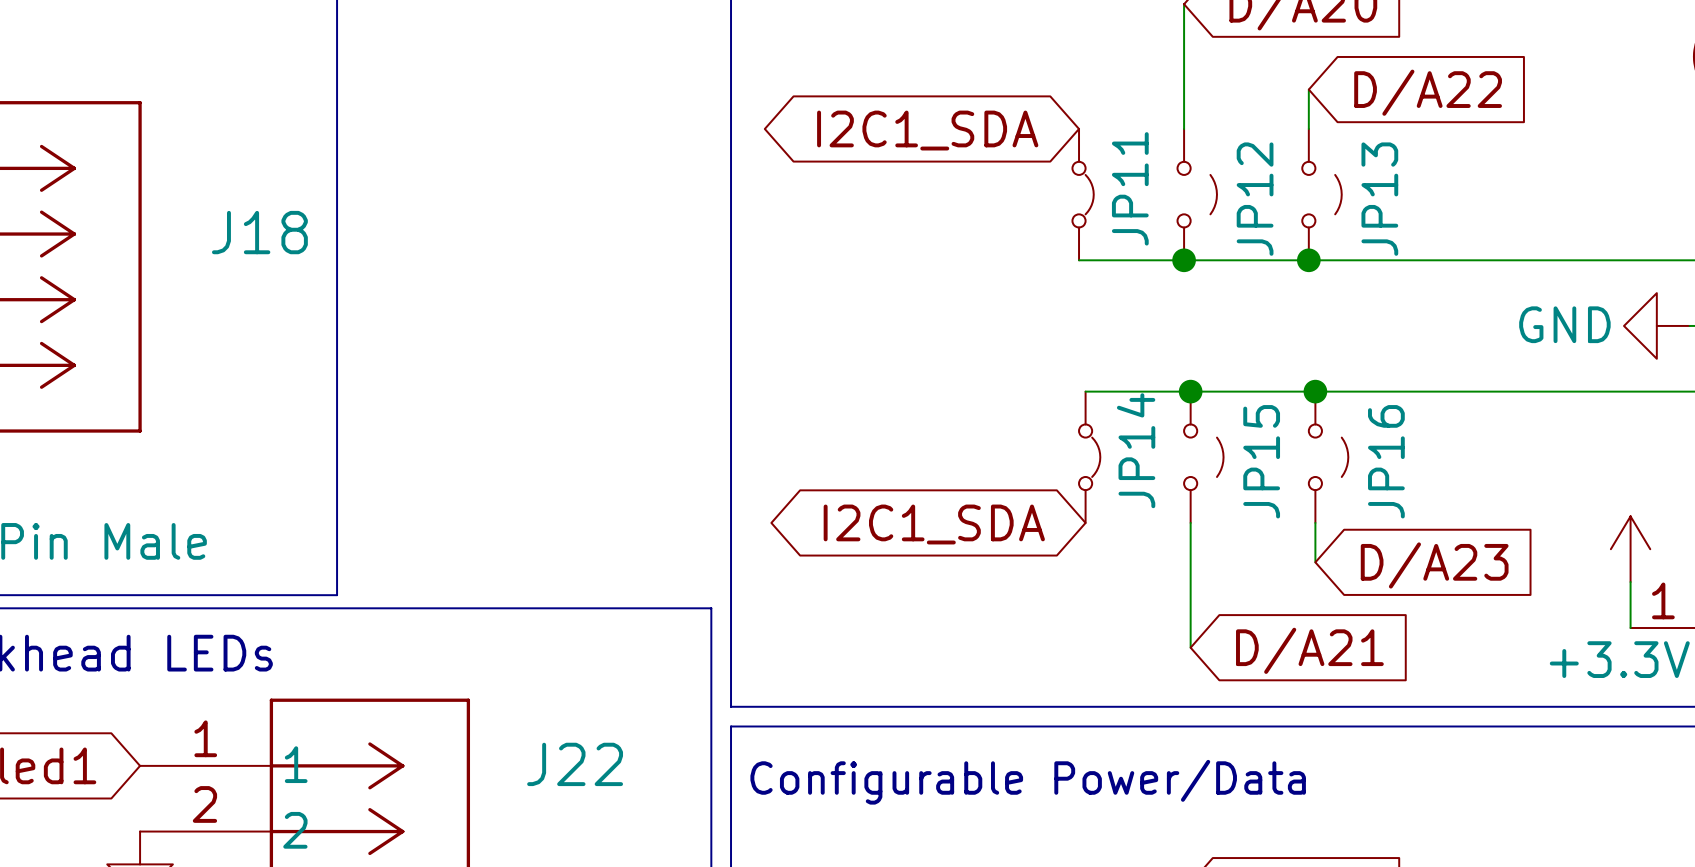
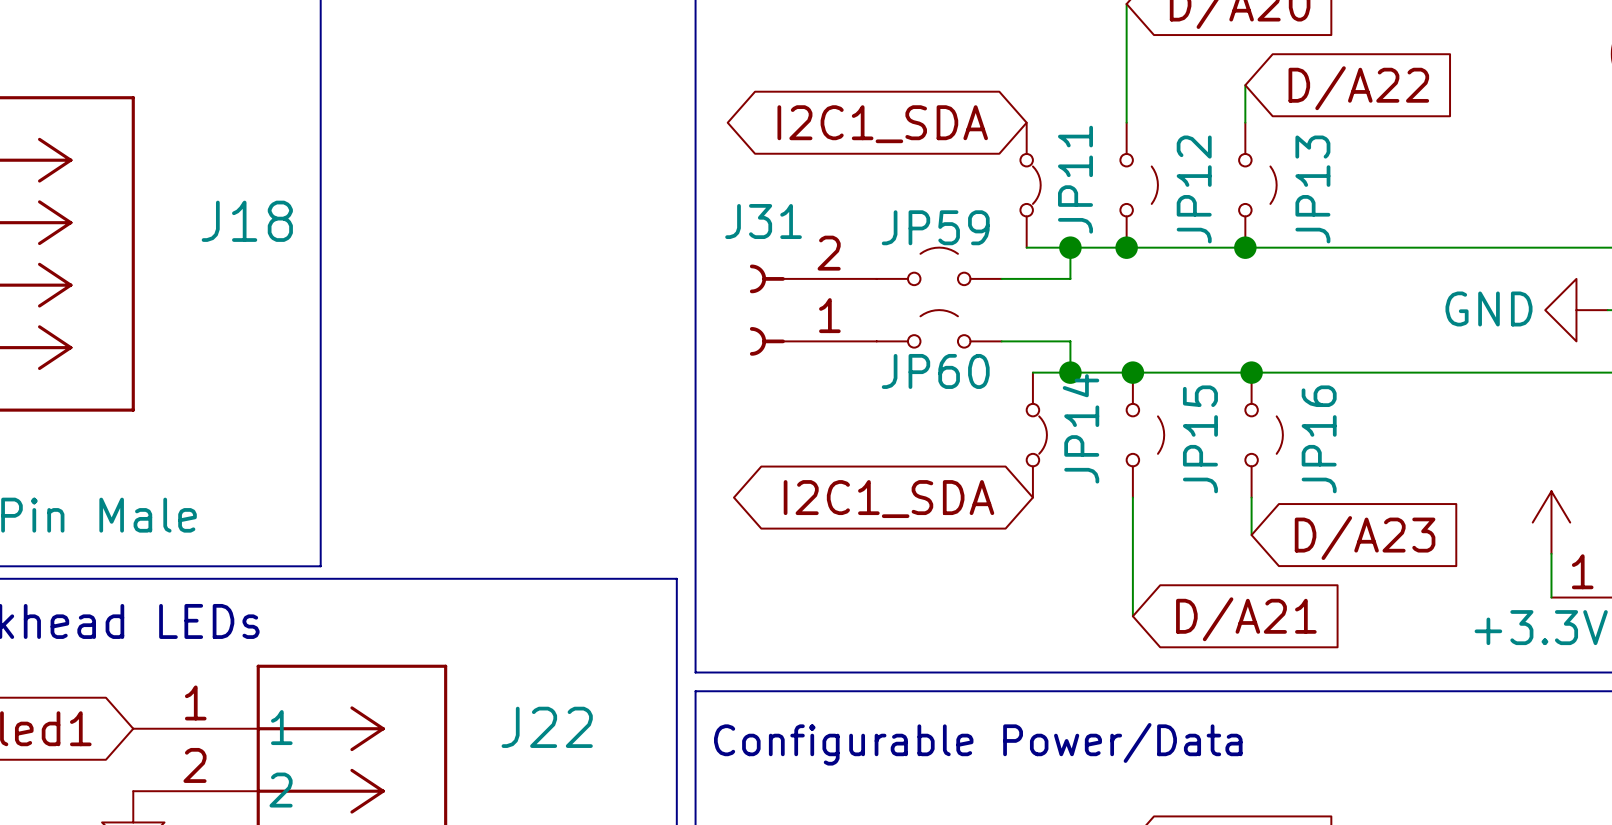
wire: none -> (1070, 247) (1070, 278) (1001, 278)
junction: none -> (1070, 247)
JP59: none -> (939, 266)
J31: none -> (813, 310)
JP60: none -> (939, 328)
wire: none -> (1001, 341) (1070, 341) (1070, 372)
junction: none -> (1070, 372)

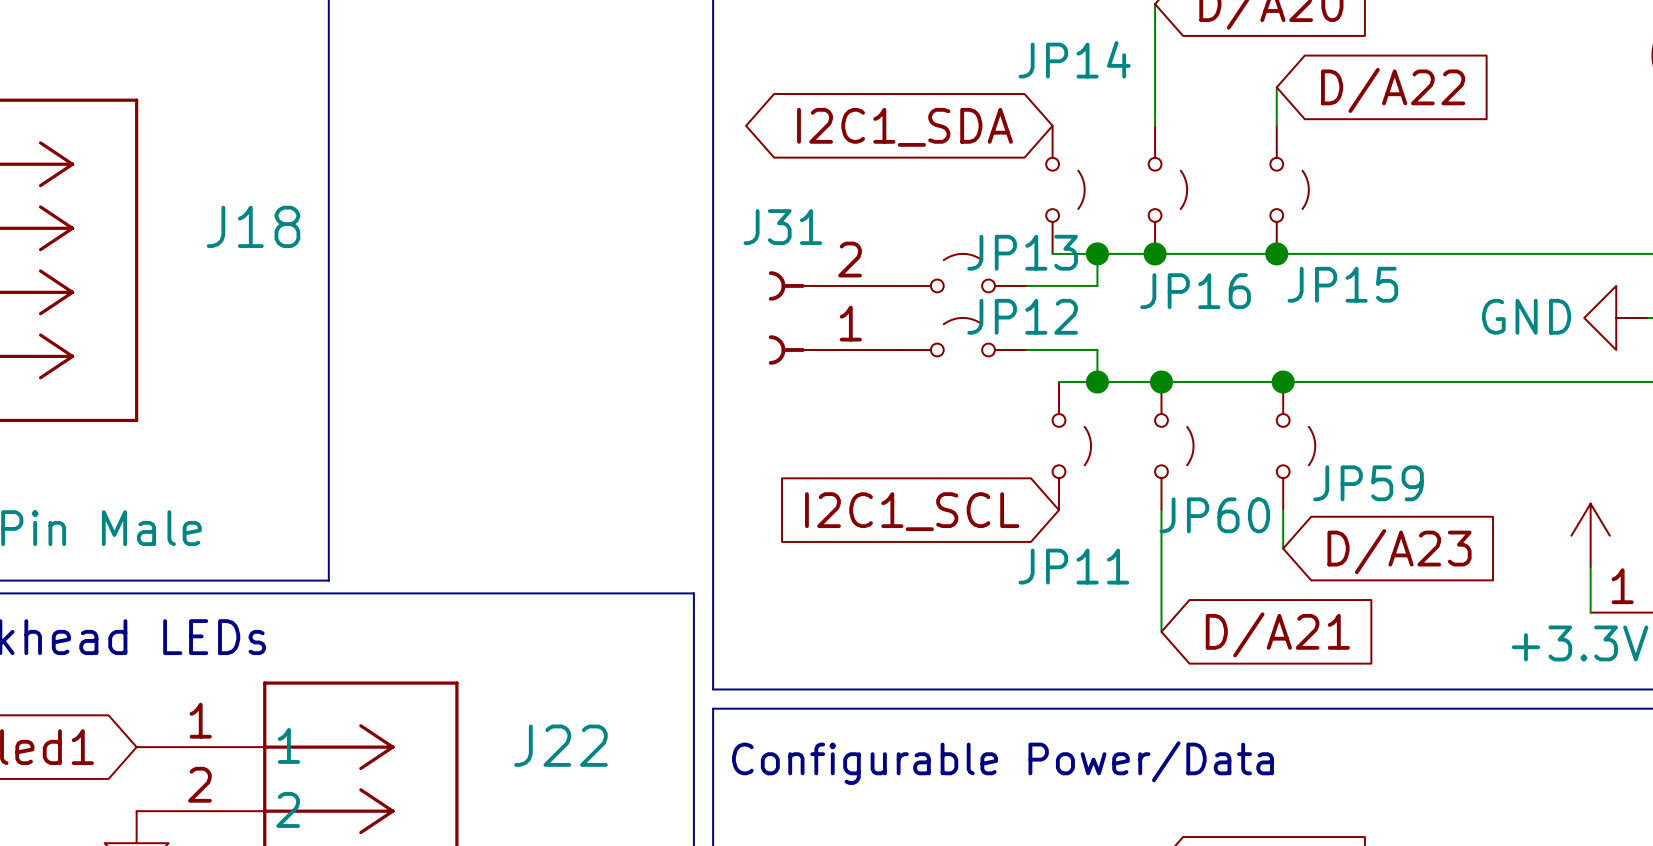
JP11 symbol: [1020, 122, 1041, 248] -> [1052, 382, 1092, 511]
JP11 name position: JP11 (1075, 179) -> JP11 (1073, 566)
JP12 name: JP12 (1194, 189) -> JP16 (1195, 291)
JP13 name: JP13 (1312, 189) -> JP15 (1342, 284)
JP59 name: JP59 (935, 227) -> JP13 (1022, 252)
JP60 name: JP60 (935, 371) -> JP12 (1022, 316)
JP14 symbol: [1026, 372, 1047, 498] -> [1046, 125, 1085, 254]
JP14 name position: JP14 (1081, 428) -> JP14 (1074, 59)
JP15 name: JP15 (1200, 439) -> JP60 (1214, 515)
JP16 name: JP16 (1319, 439) -> JP59 (1368, 483)
global label shape: bidirectional (888, 499) -> input (912, 511)
global label: I2C1_SDA (888, 499) -> I2C1_SCL (912, 511)

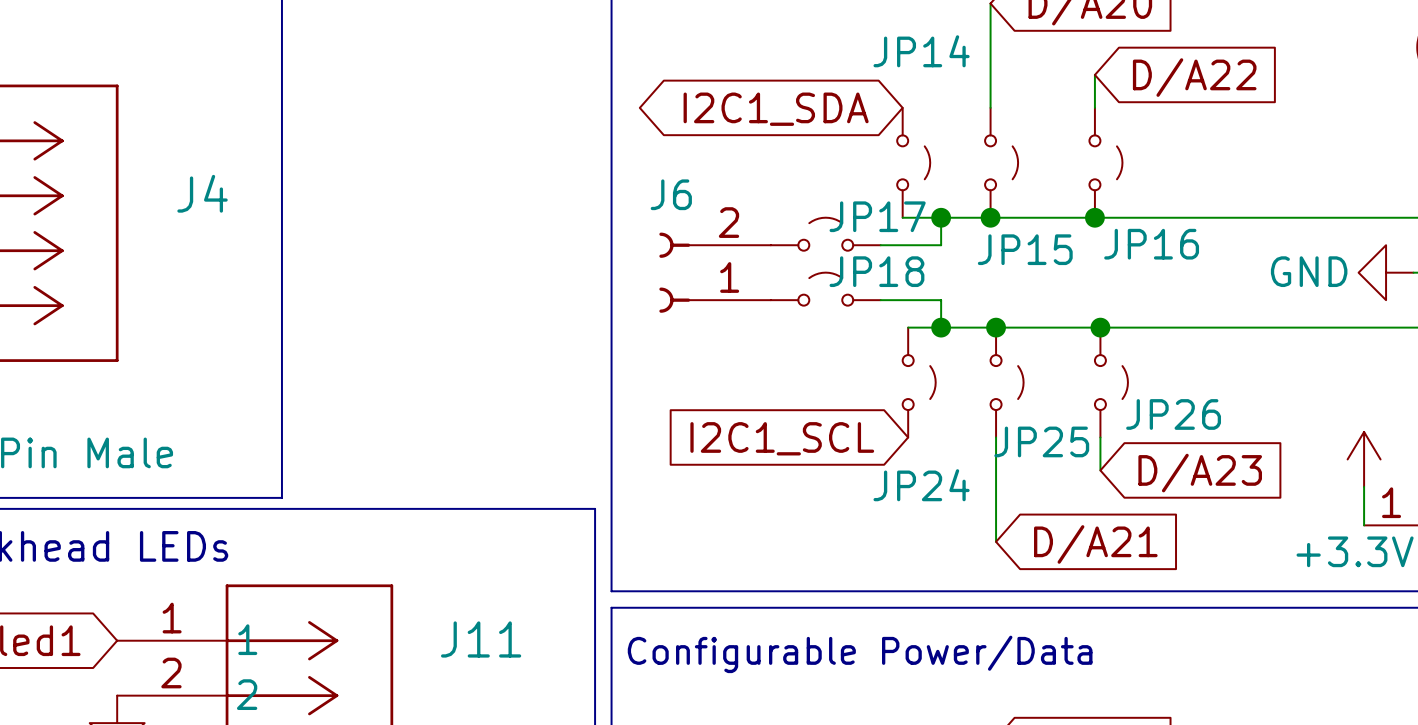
J18 name: J18 (253, 226) -> J4 (202, 193)
J31 name: J31 (782, 227) -> J6 (671, 194)
JP13 name: JP13 (1022, 252) -> JP17 (877, 216)
JP15 name: JP15 (1342, 284) -> JP16 (1151, 244)
JP16 name: JP16 (1195, 291) -> JP15 (1025, 249)
JP12 name: JP12 (1022, 316) -> JP18 (876, 271)
JP59 name: JP59 (1368, 483) -> JP26 (1173, 414)
JP60 name: JP60 (1214, 515) -> JP25 (1041, 441)
JP11 name: JP11 (1073, 566) -> JP24 (921, 485)
J22 name: J22 (561, 745) -> J11 (481, 639)

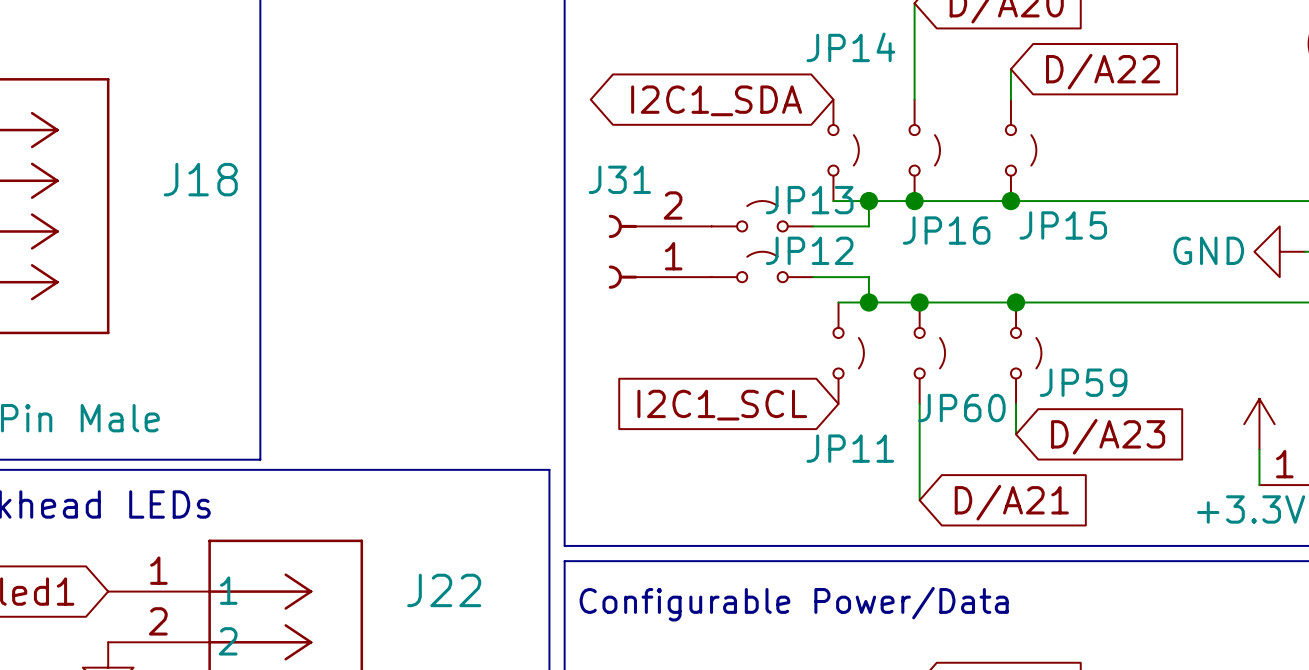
J4 name: J4 (202, 193) -> J18 (200, 179)
J6 name: J6 (671, 194) -> J31 (619, 179)
JP17 name: JP17 (877, 216) -> JP13 (809, 200)
JP16 name: JP16 (1151, 244) -> JP15 (1063, 225)
JP15 name: JP15 (1025, 249) -> JP16 (946, 230)
JP18 name: JP18 (876, 271) -> JP12 (809, 250)
JP26 name: JP26 (1173, 414) -> JP59 (1083, 382)
JP25 name: JP25 (1041, 441) -> JP60 (961, 408)
JP24 name: JP24 (921, 485) -> JP11 (850, 448)
J11 name: J11 (481, 639) -> J22 (444, 590)

